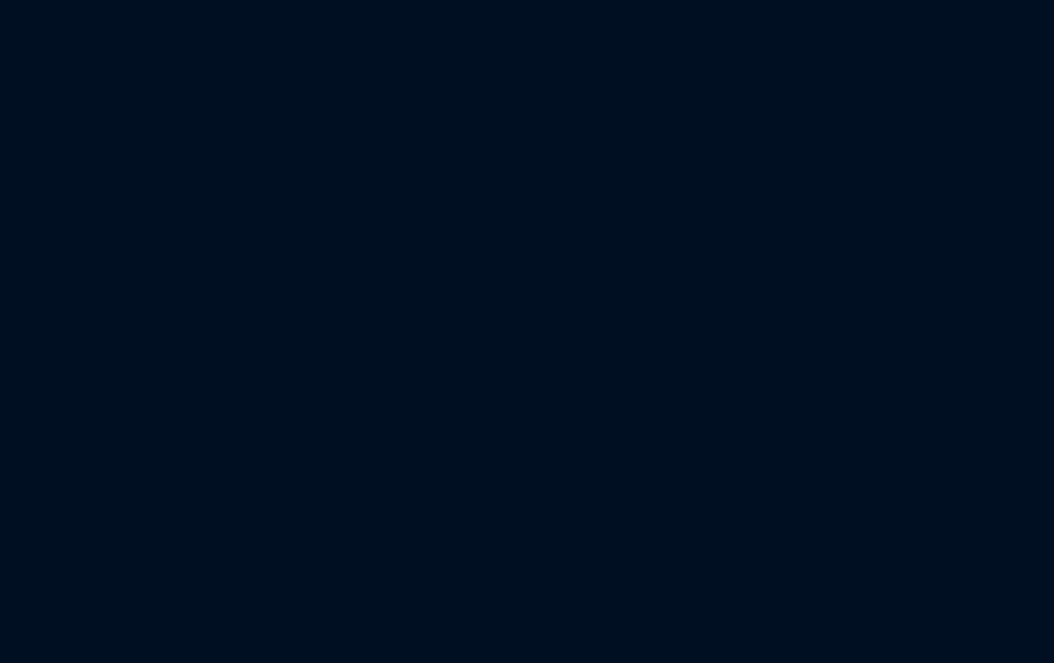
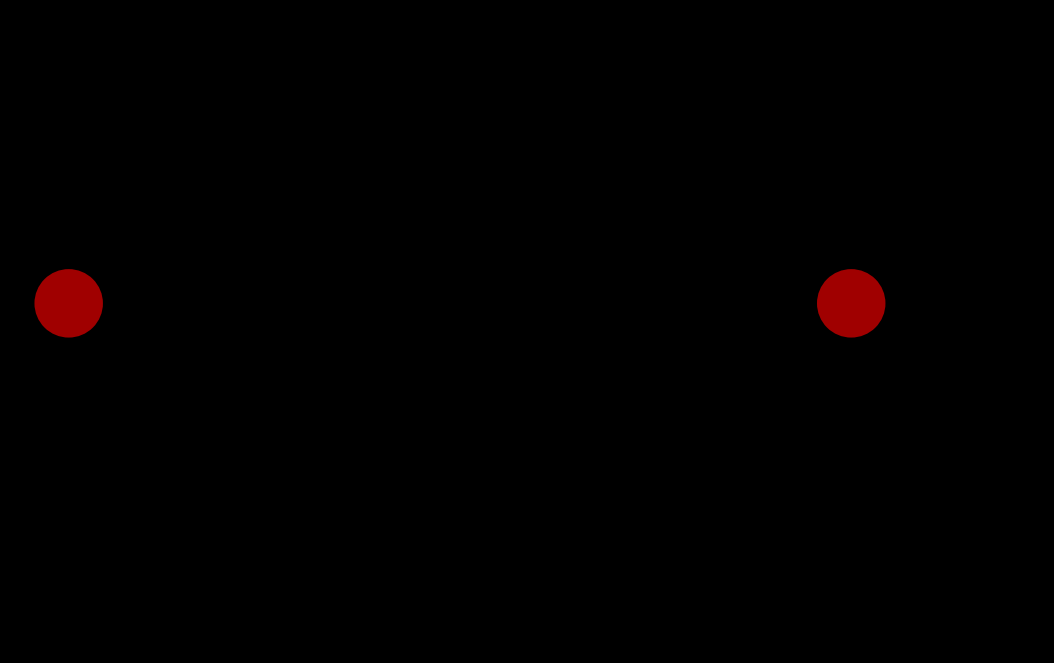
part: none -> (68, 303)
part: none -> (851, 303)

